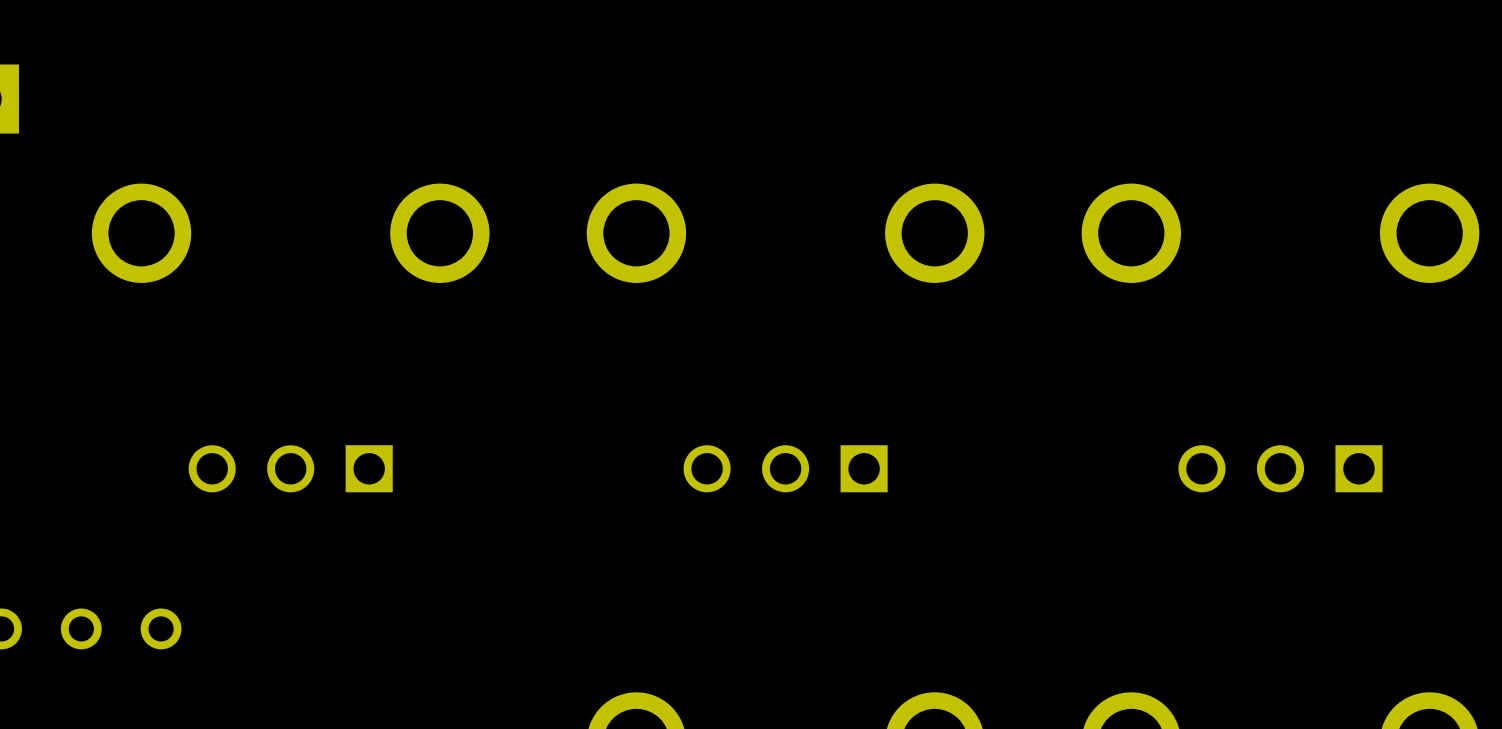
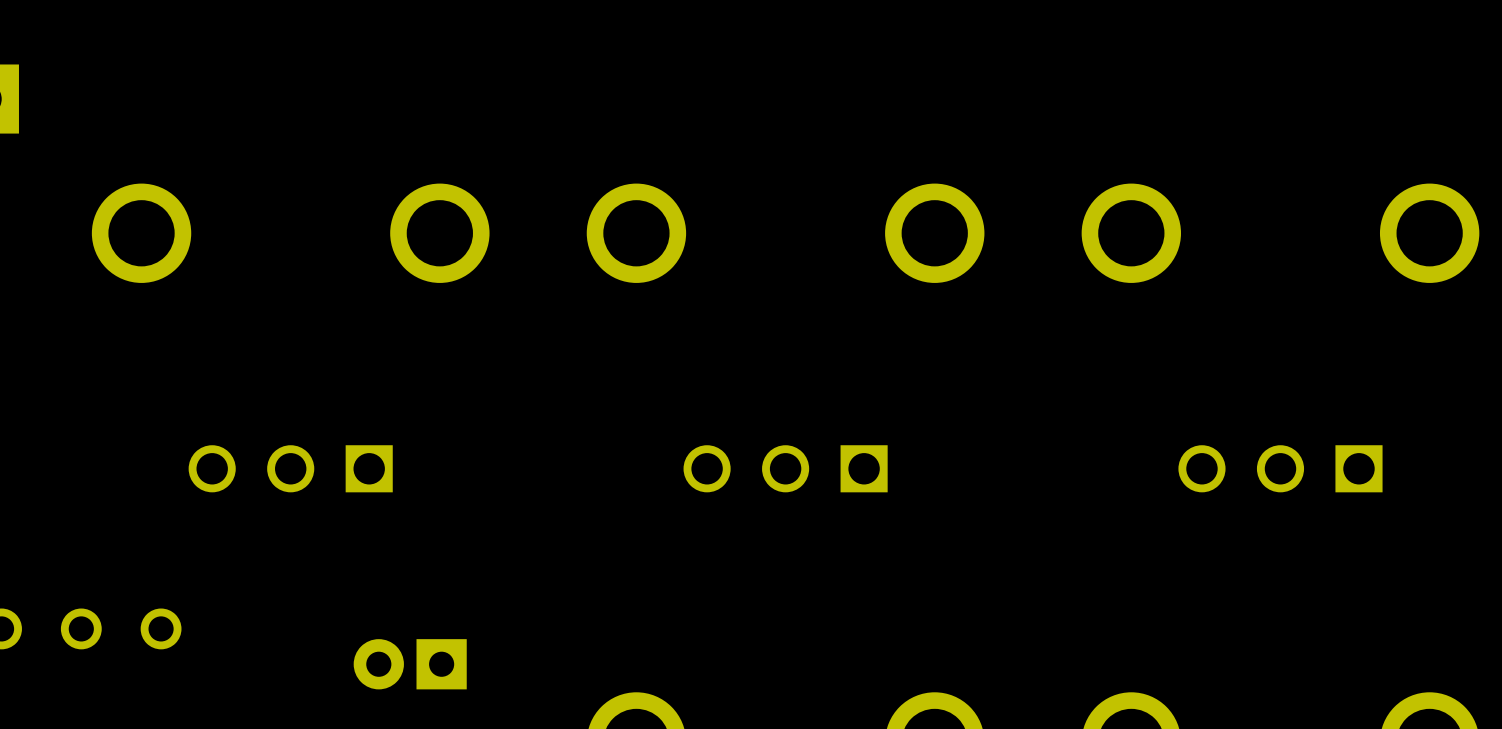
part: none -> (410, 664)

